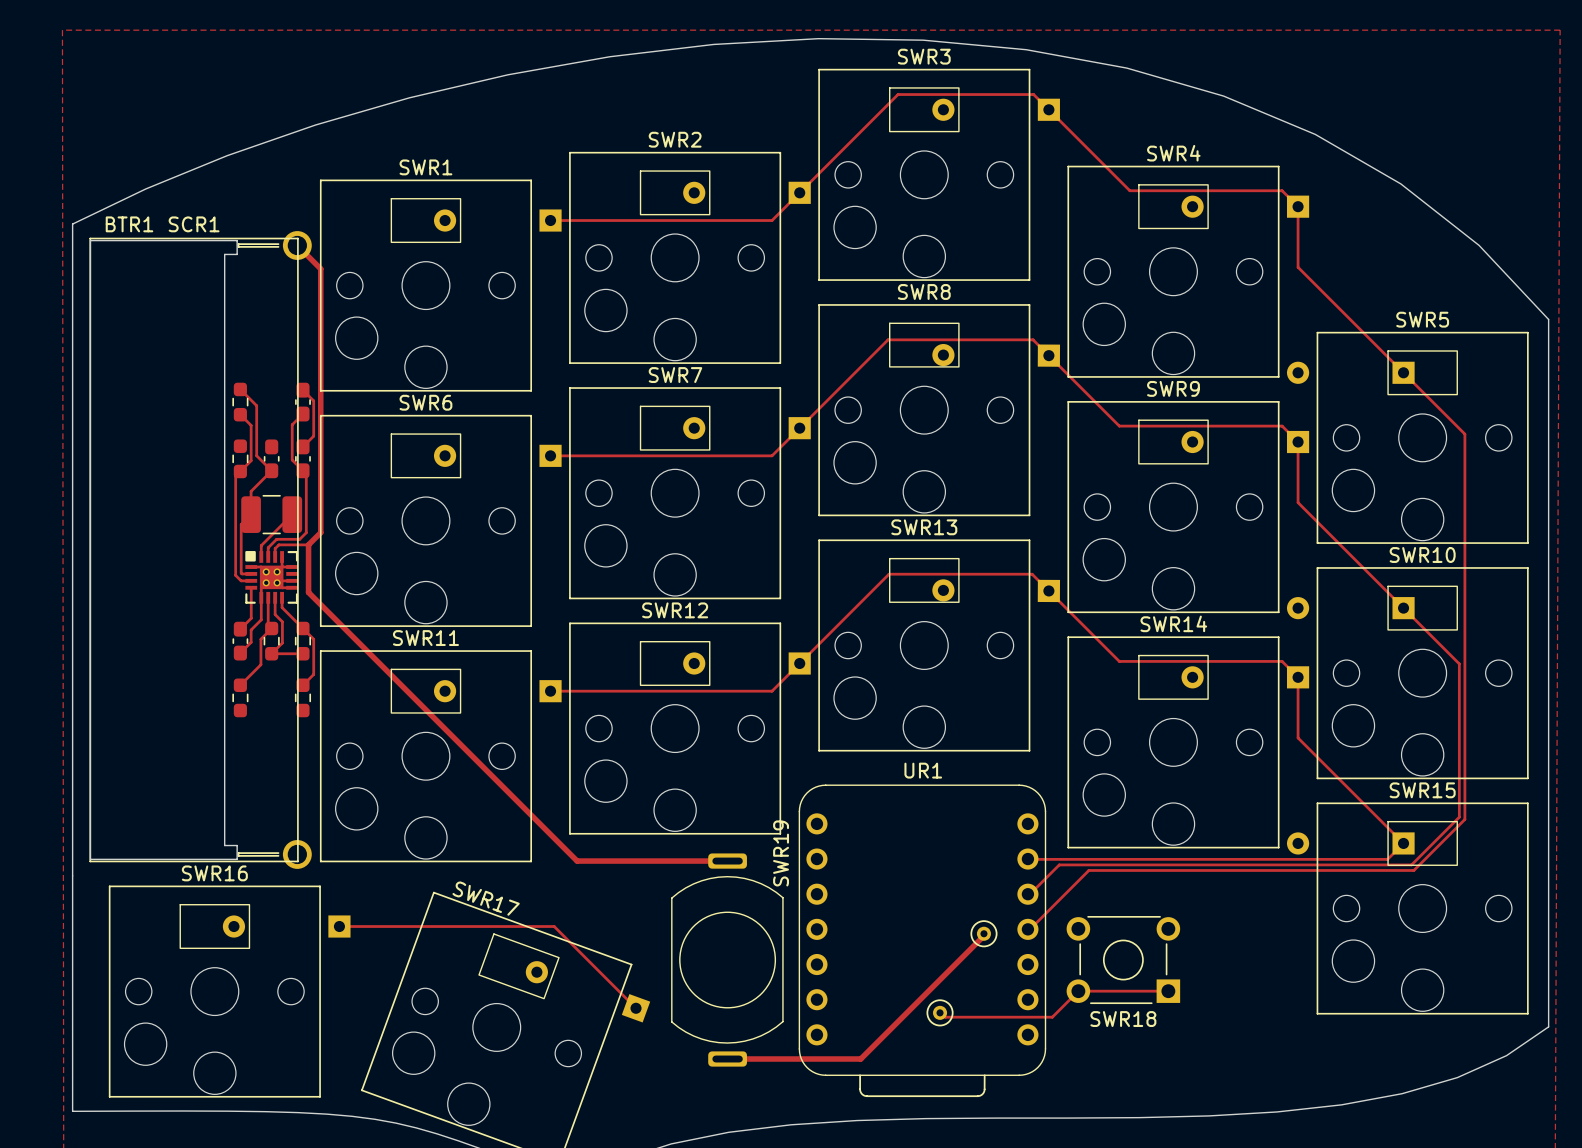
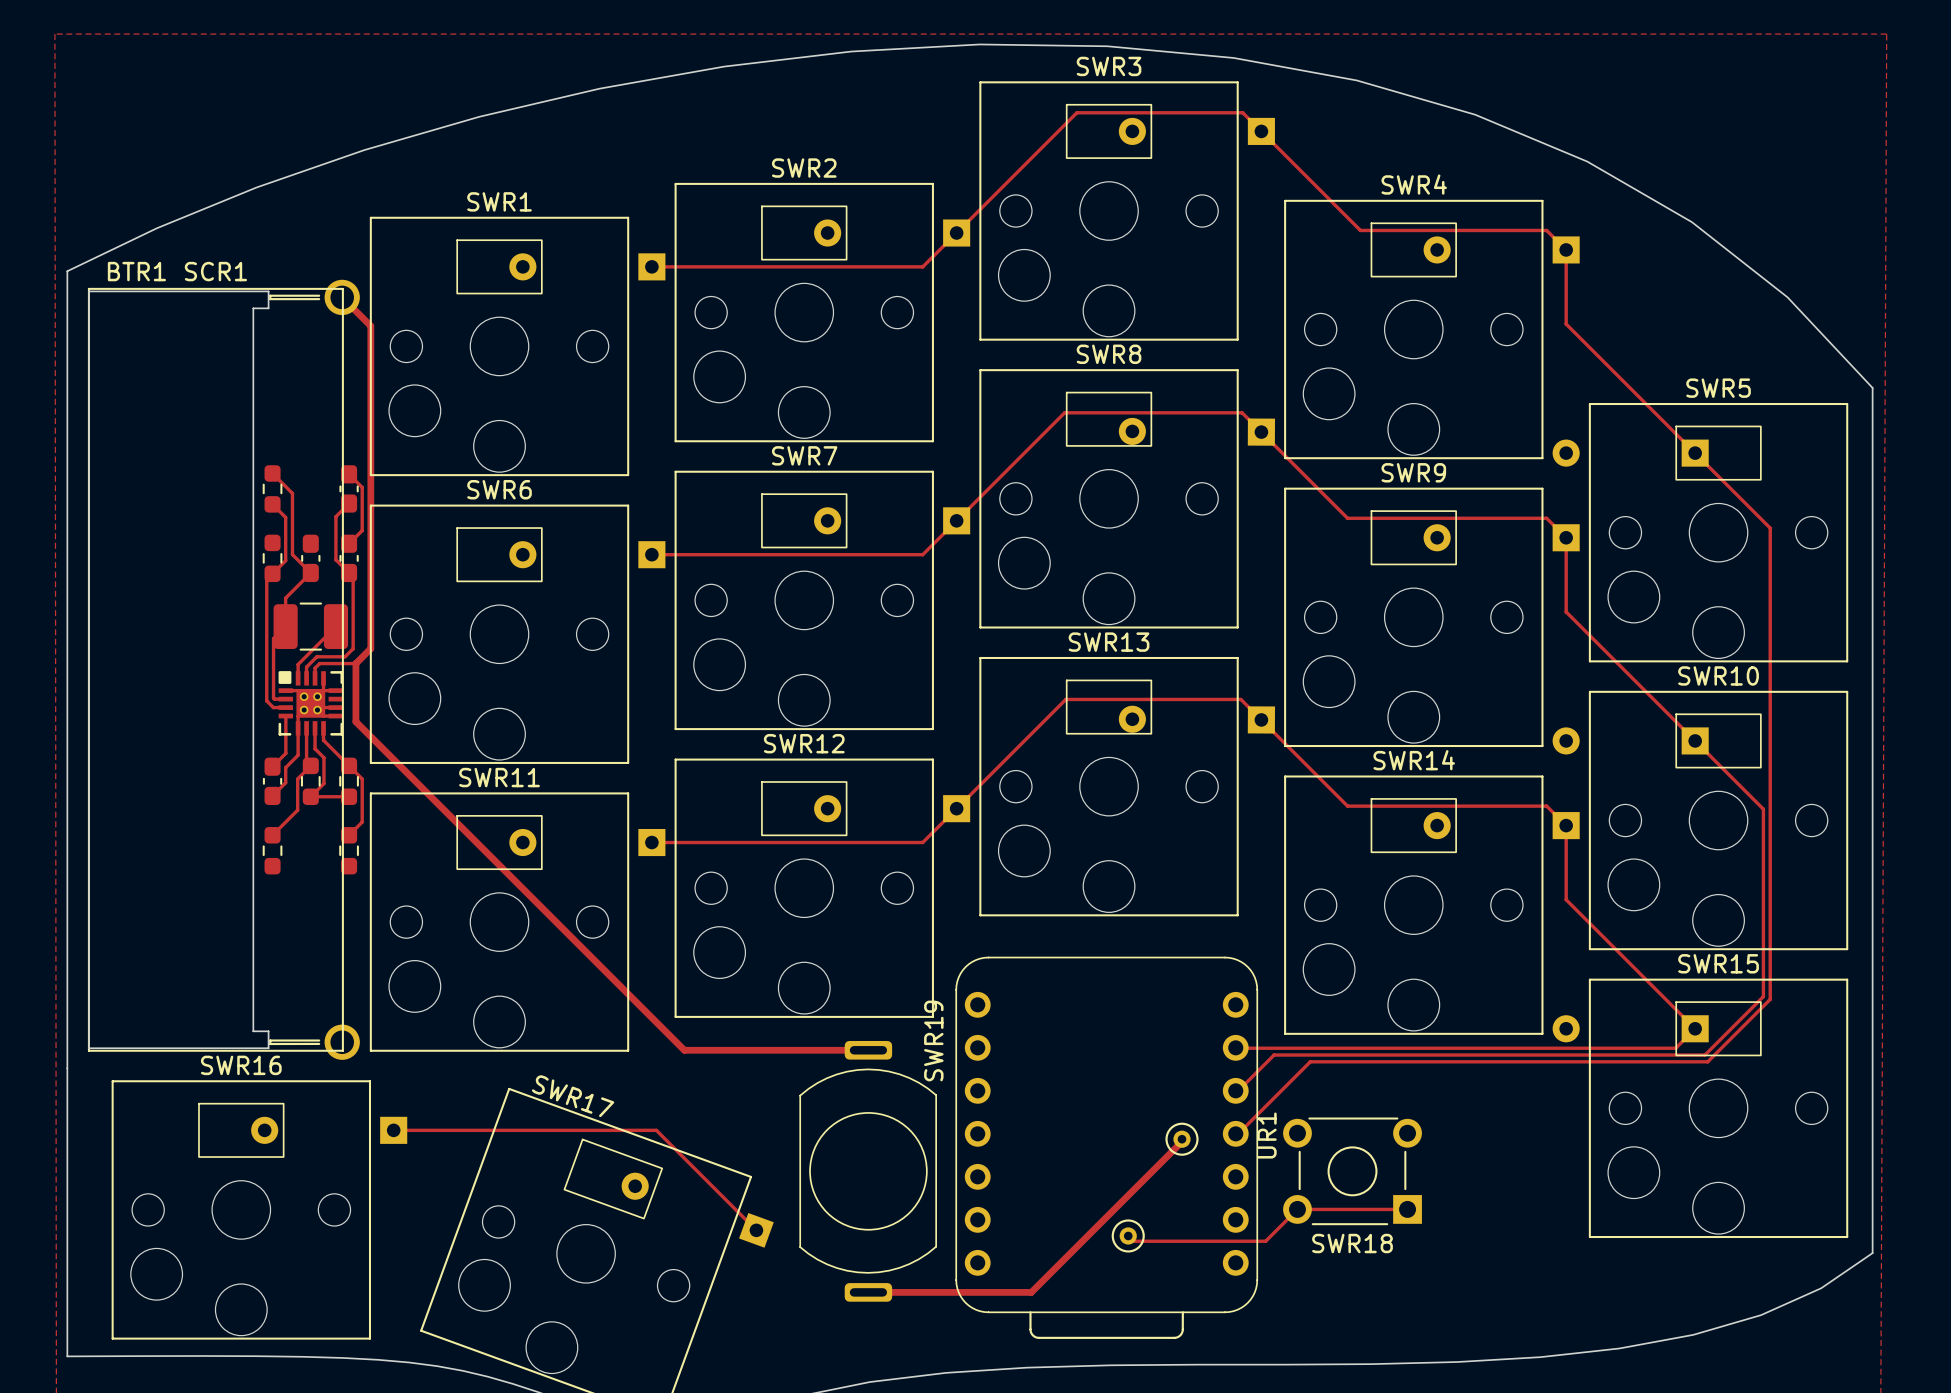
UR1 name rotation: 0° (923, 770) -> 90° counterclockwise (1266, 1135)
UR1 name position: UR1 (923, 770) -> UR1 (1266, 1135)

